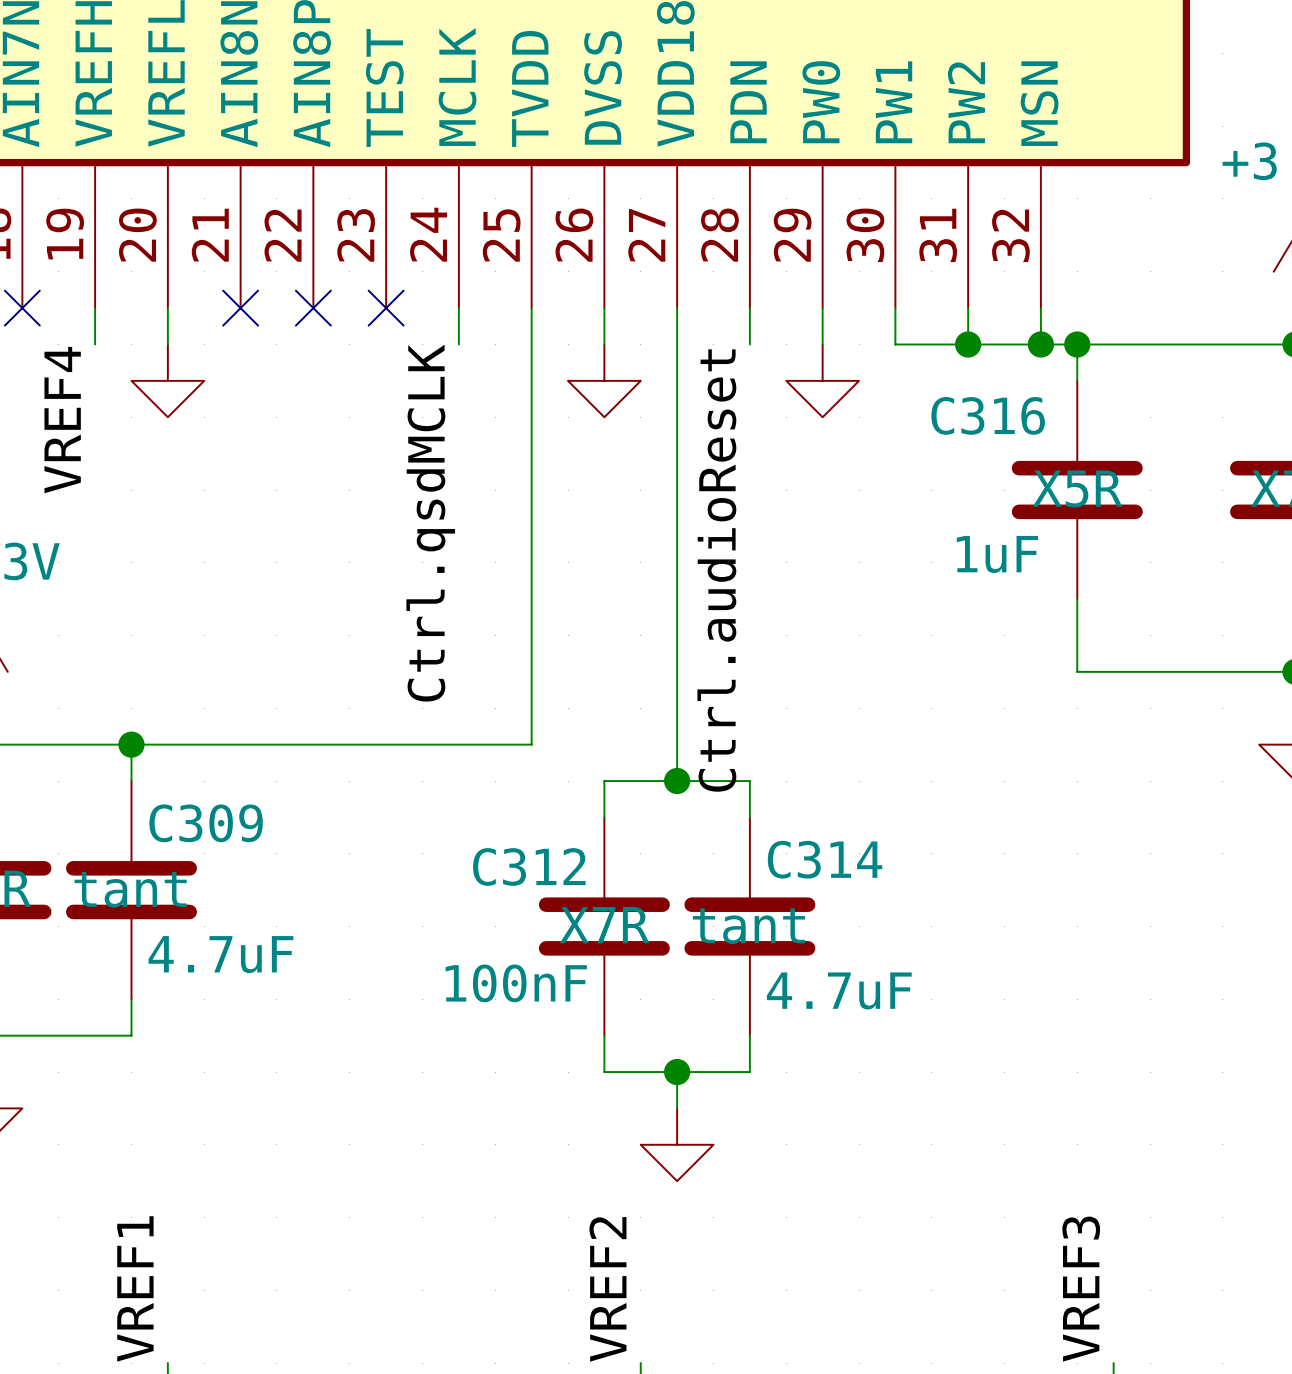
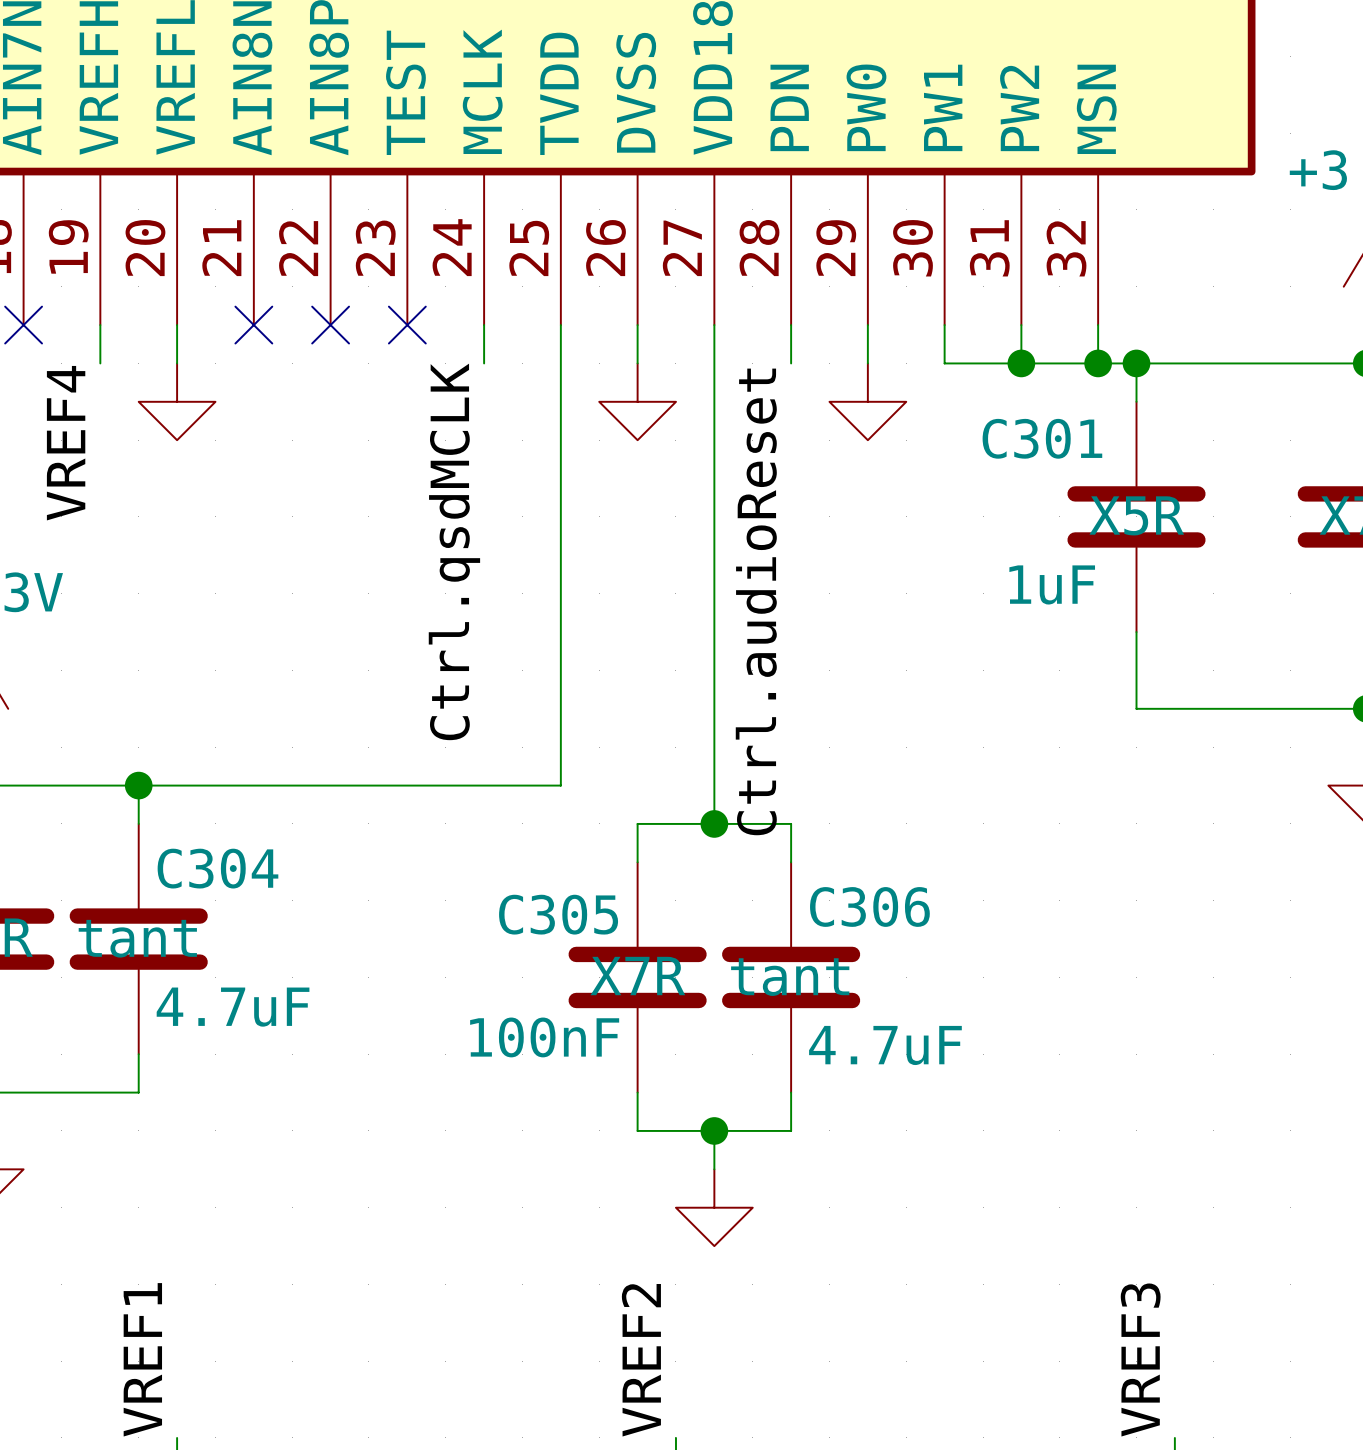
C316 name: C316 (988, 415) -> C301 (1042, 438)
C309 name: C309 (206, 823) -> C304 (217, 868)
C314 name: C314 (825, 859) -> C306 (869, 906)
C312 name: C312 (529, 866) -> C305 (558, 914)

